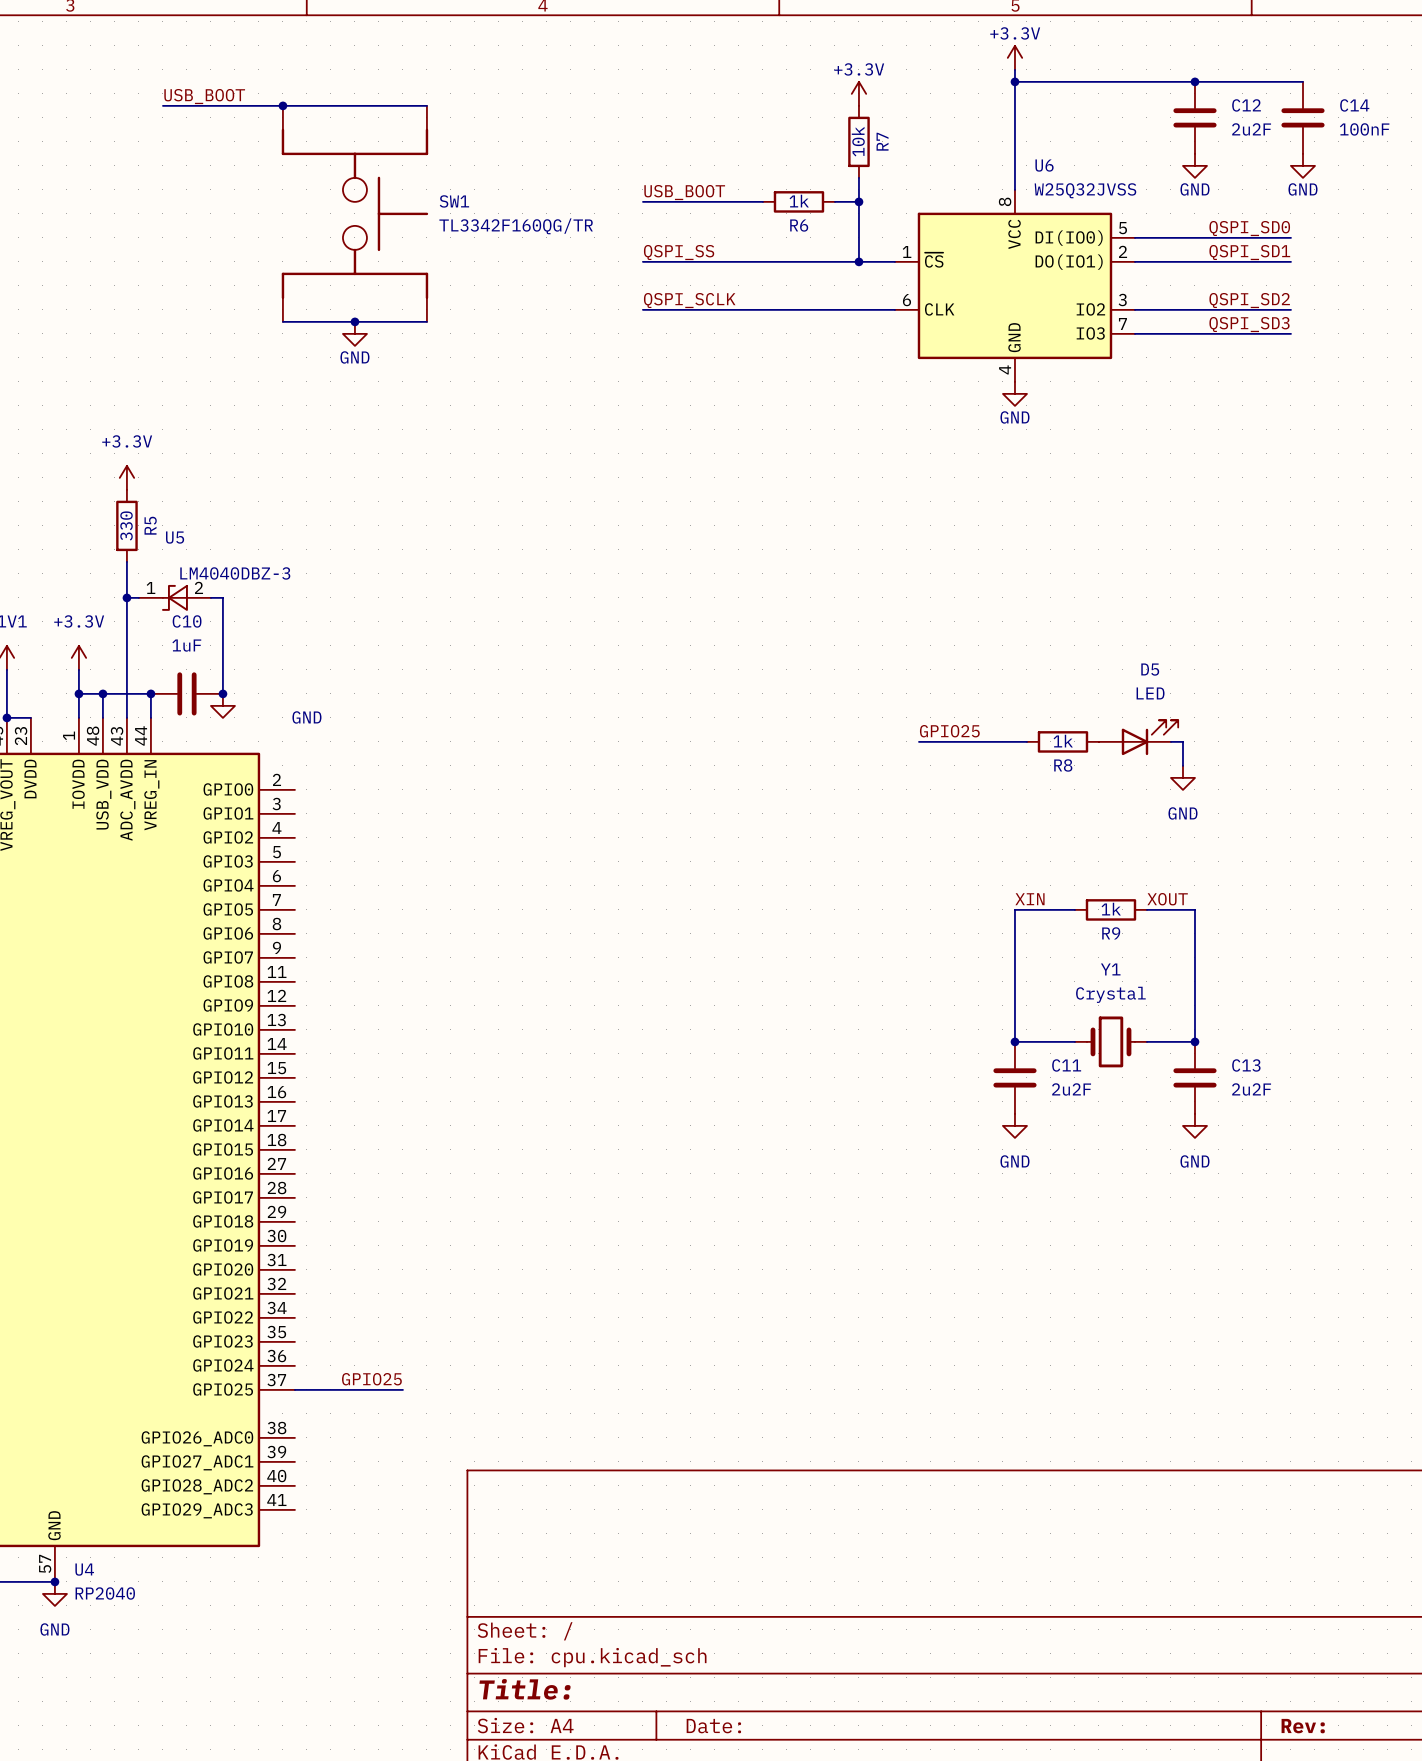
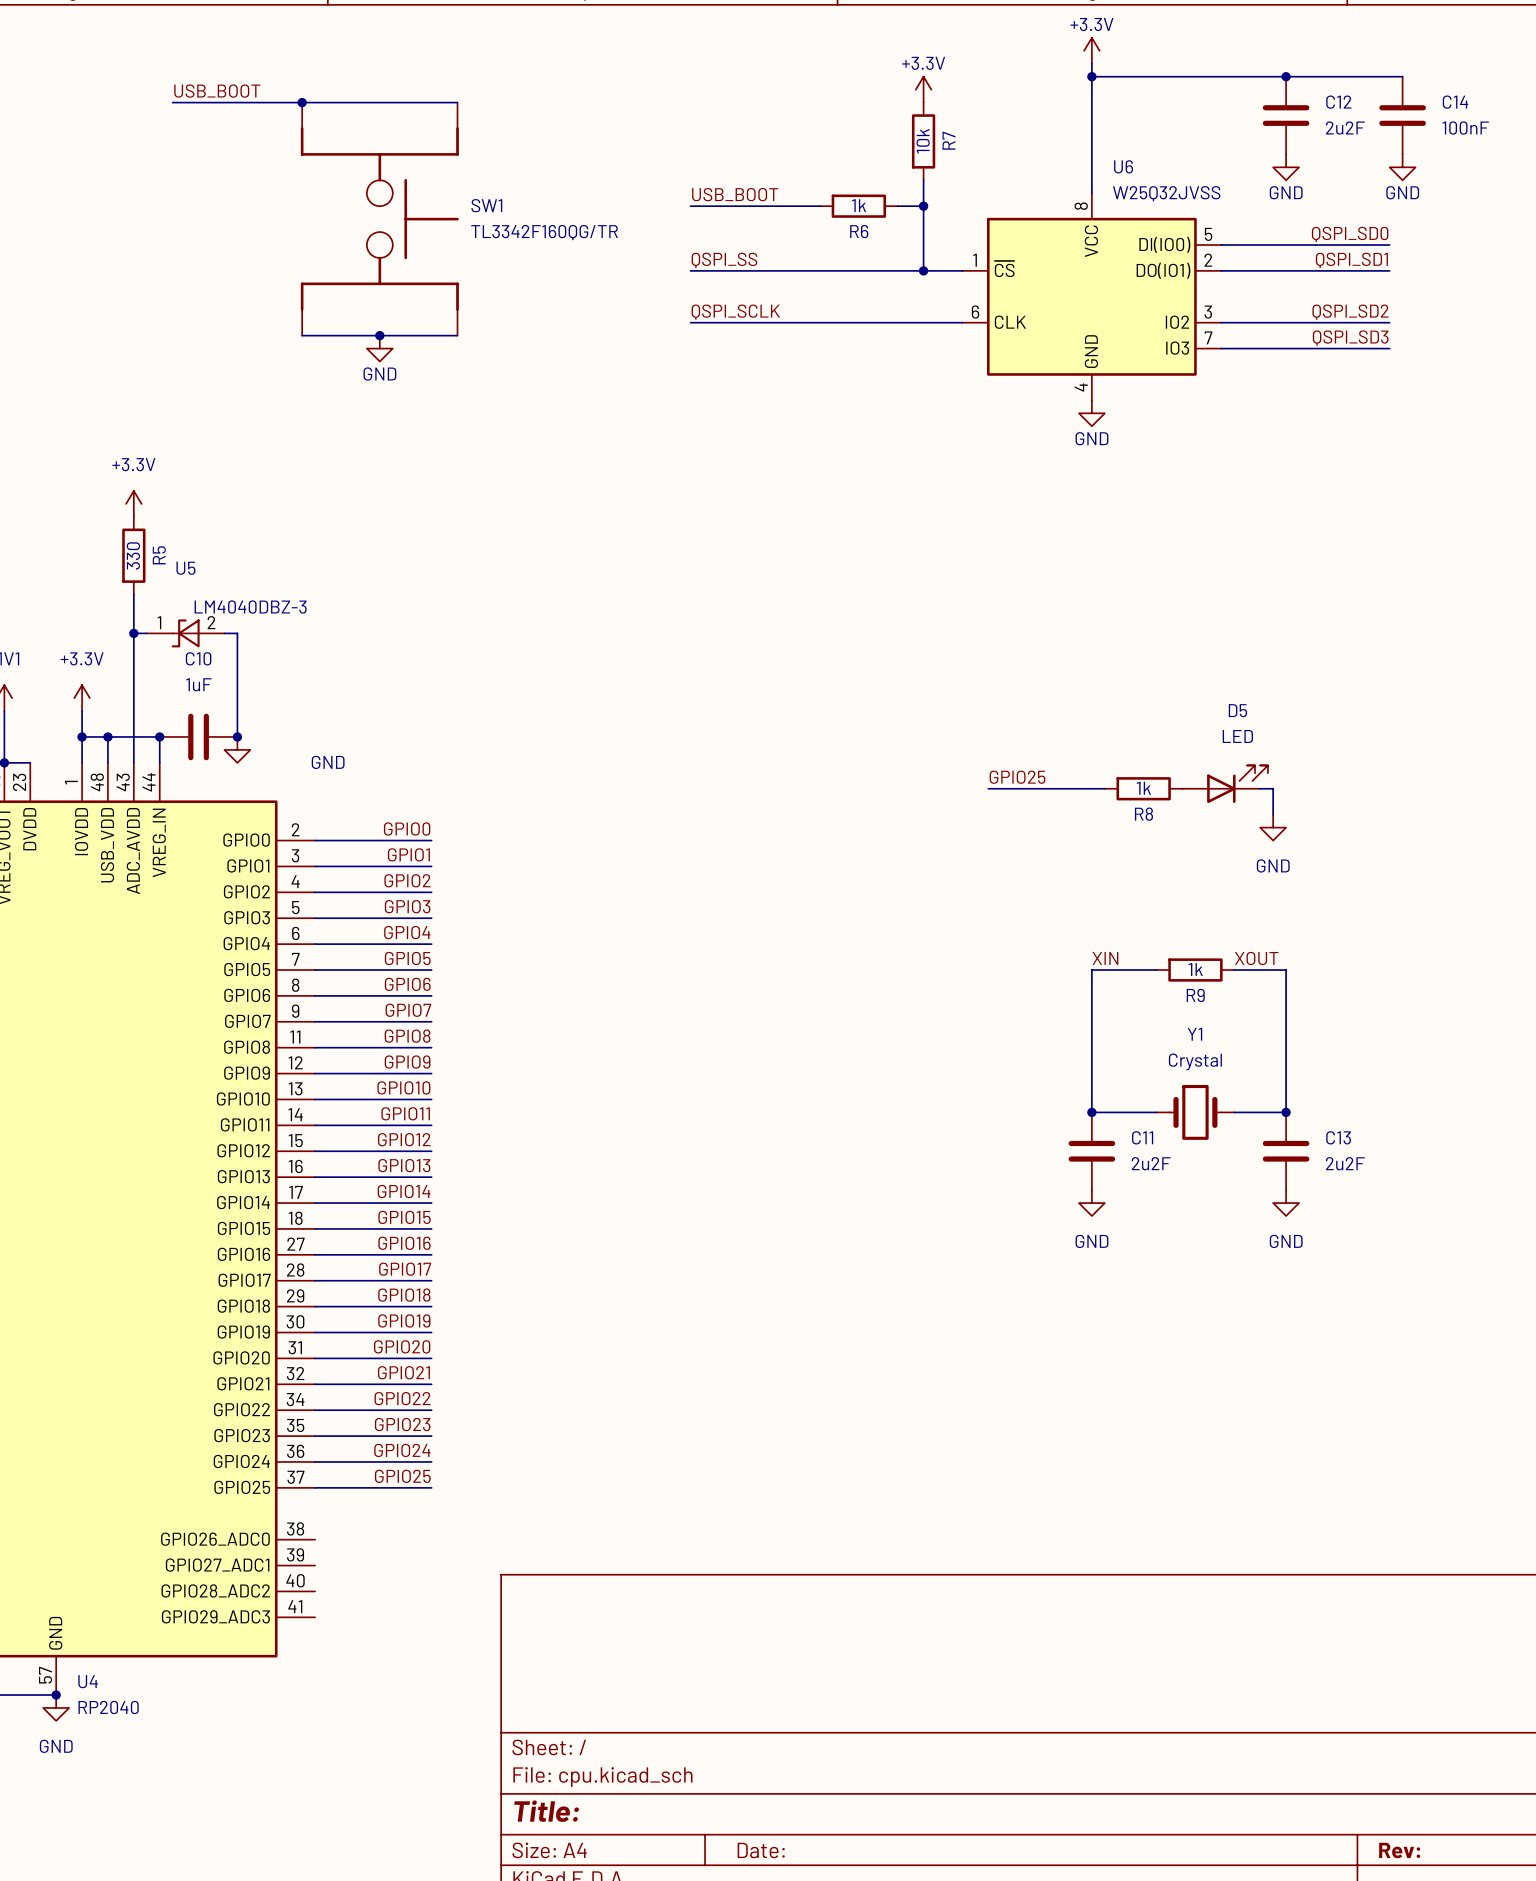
label: none -> GPIO0 (407, 829)
wire: none -> (315, 840) (431, 840)
label: none -> GPIO1 (408, 854)
wire: none -> (315, 866) (431, 866)
label: none -> GPIO2 (407, 880)
wire: none -> (315, 892) (431, 892)
label: none -> GPIO3 (407, 906)
wire: none -> (315, 918) (431, 918)
label: none -> GPIO4 (407, 932)
wire: none -> (315, 944) (431, 944)
label: none -> GPIO5 (407, 958)
wire: none -> (315, 970) (431, 970)
label: none -> GPIO6 (407, 984)
wire: none -> (315, 995) (431, 995)
label: none -> GPIO7 (408, 1010)
wire: none -> (315, 1021) (431, 1021)
label: none -> GPIO8 (407, 1036)
wire: none -> (315, 1047) (431, 1047)
label: none -> GPIO9 (407, 1062)
wire: none -> (315, 1073) (431, 1073)
label: none -> GPIO10 (403, 1087)
wire: none -> (315, 1099) (431, 1099)
label: none -> GPIO11 (405, 1113)
wire: none -> (315, 1125) (431, 1125)
label: none -> GPIO12 (404, 1139)
wire: none -> (315, 1151) (431, 1151)
label: none -> GPIO13 (404, 1165)
wire: none -> (315, 1177) (431, 1177)
label: none -> GPIO14 (404, 1191)
wire: none -> (315, 1203) (431, 1203)
label: none -> GPIO15 (404, 1217)
wire: none -> (315, 1228) (431, 1228)
label: none -> GPIO16 (404, 1243)
wire: none -> (315, 1254) (431, 1254)
label: none -> GPIO17 (405, 1269)
wire: none -> (315, 1280) (431, 1280)
label: none -> GPIO18 (404, 1295)
wire: none -> (315, 1306) (431, 1306)
label: none -> GPIO19 (404, 1320)
wire: none -> (315, 1332) (431, 1332)
label: none -> GPIO20 (402, 1346)
wire: none -> (315, 1358) (431, 1358)
label: none -> GPIO21 (403, 1372)
wire: none -> (315, 1384) (431, 1384)
label: none -> GPIO22 (402, 1398)
wire: none -> (315, 1410) (431, 1410)
label: none -> GPIO23 (402, 1424)
wire: none -> (315, 1436) (431, 1436)
label: none -> GPIO24 (402, 1450)
wire: none -> (315, 1461) (431, 1461)

